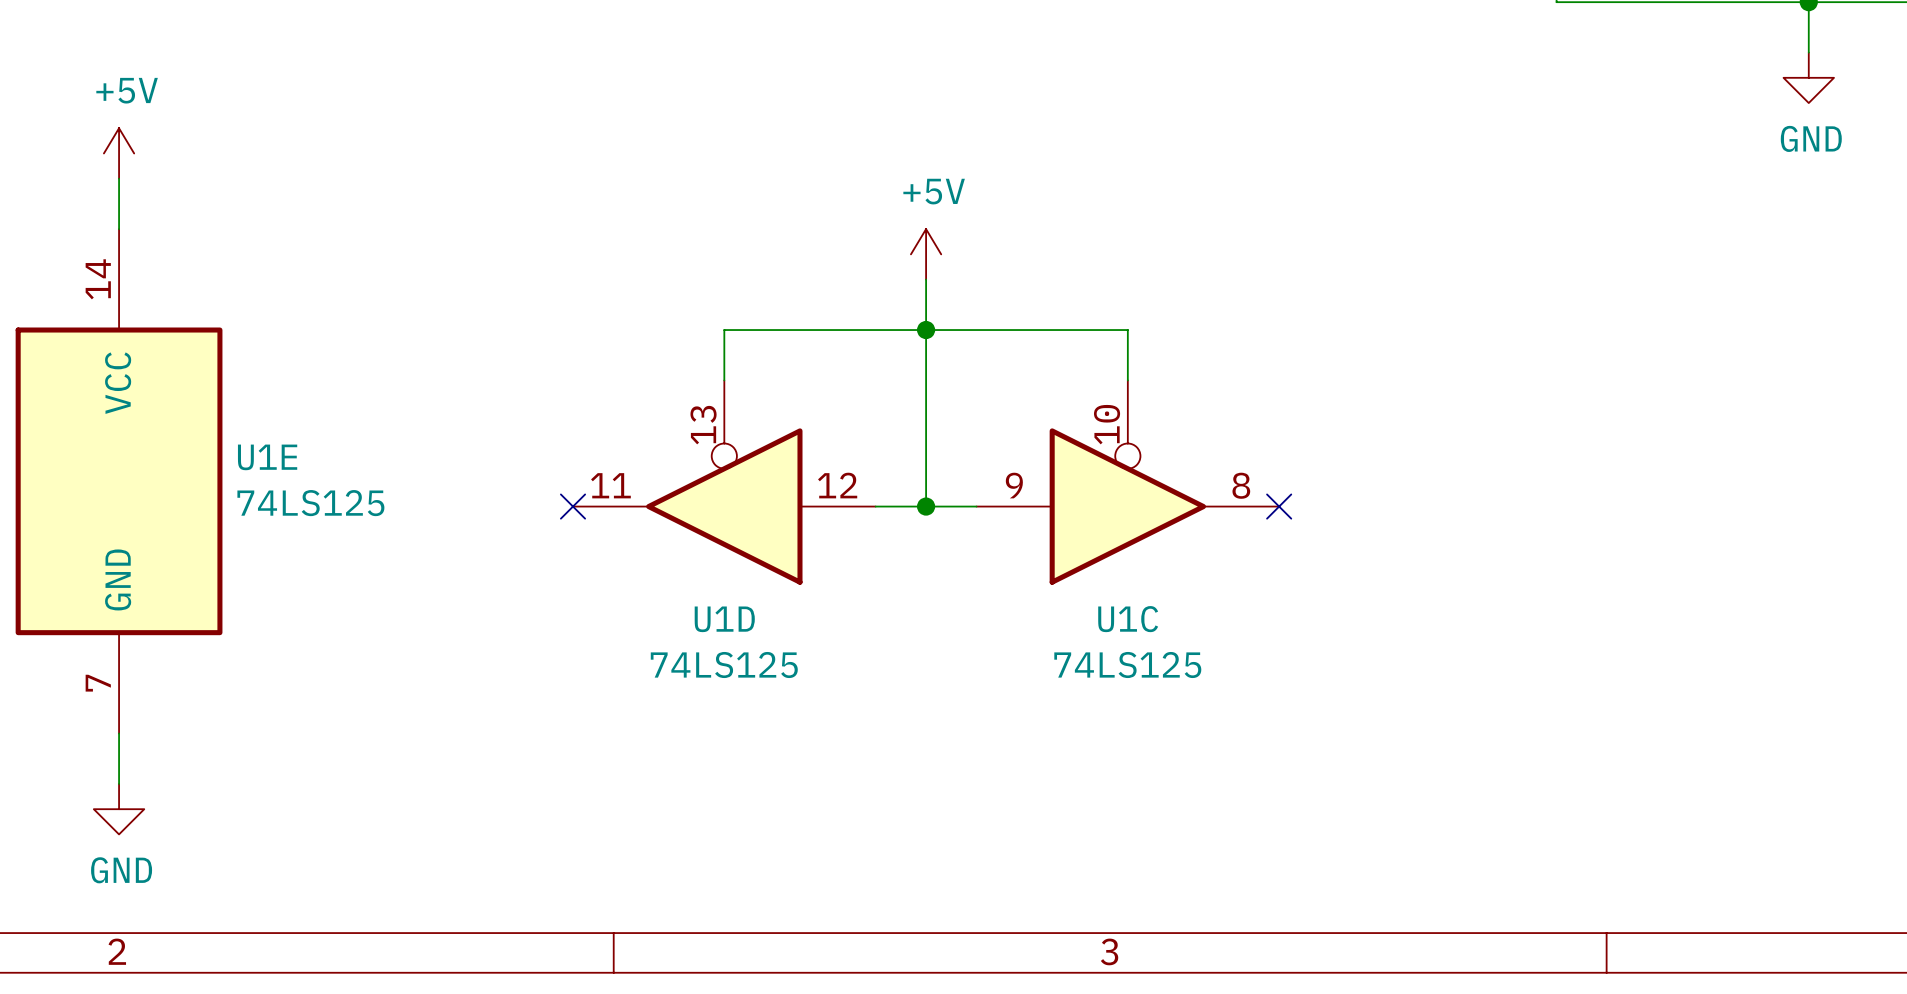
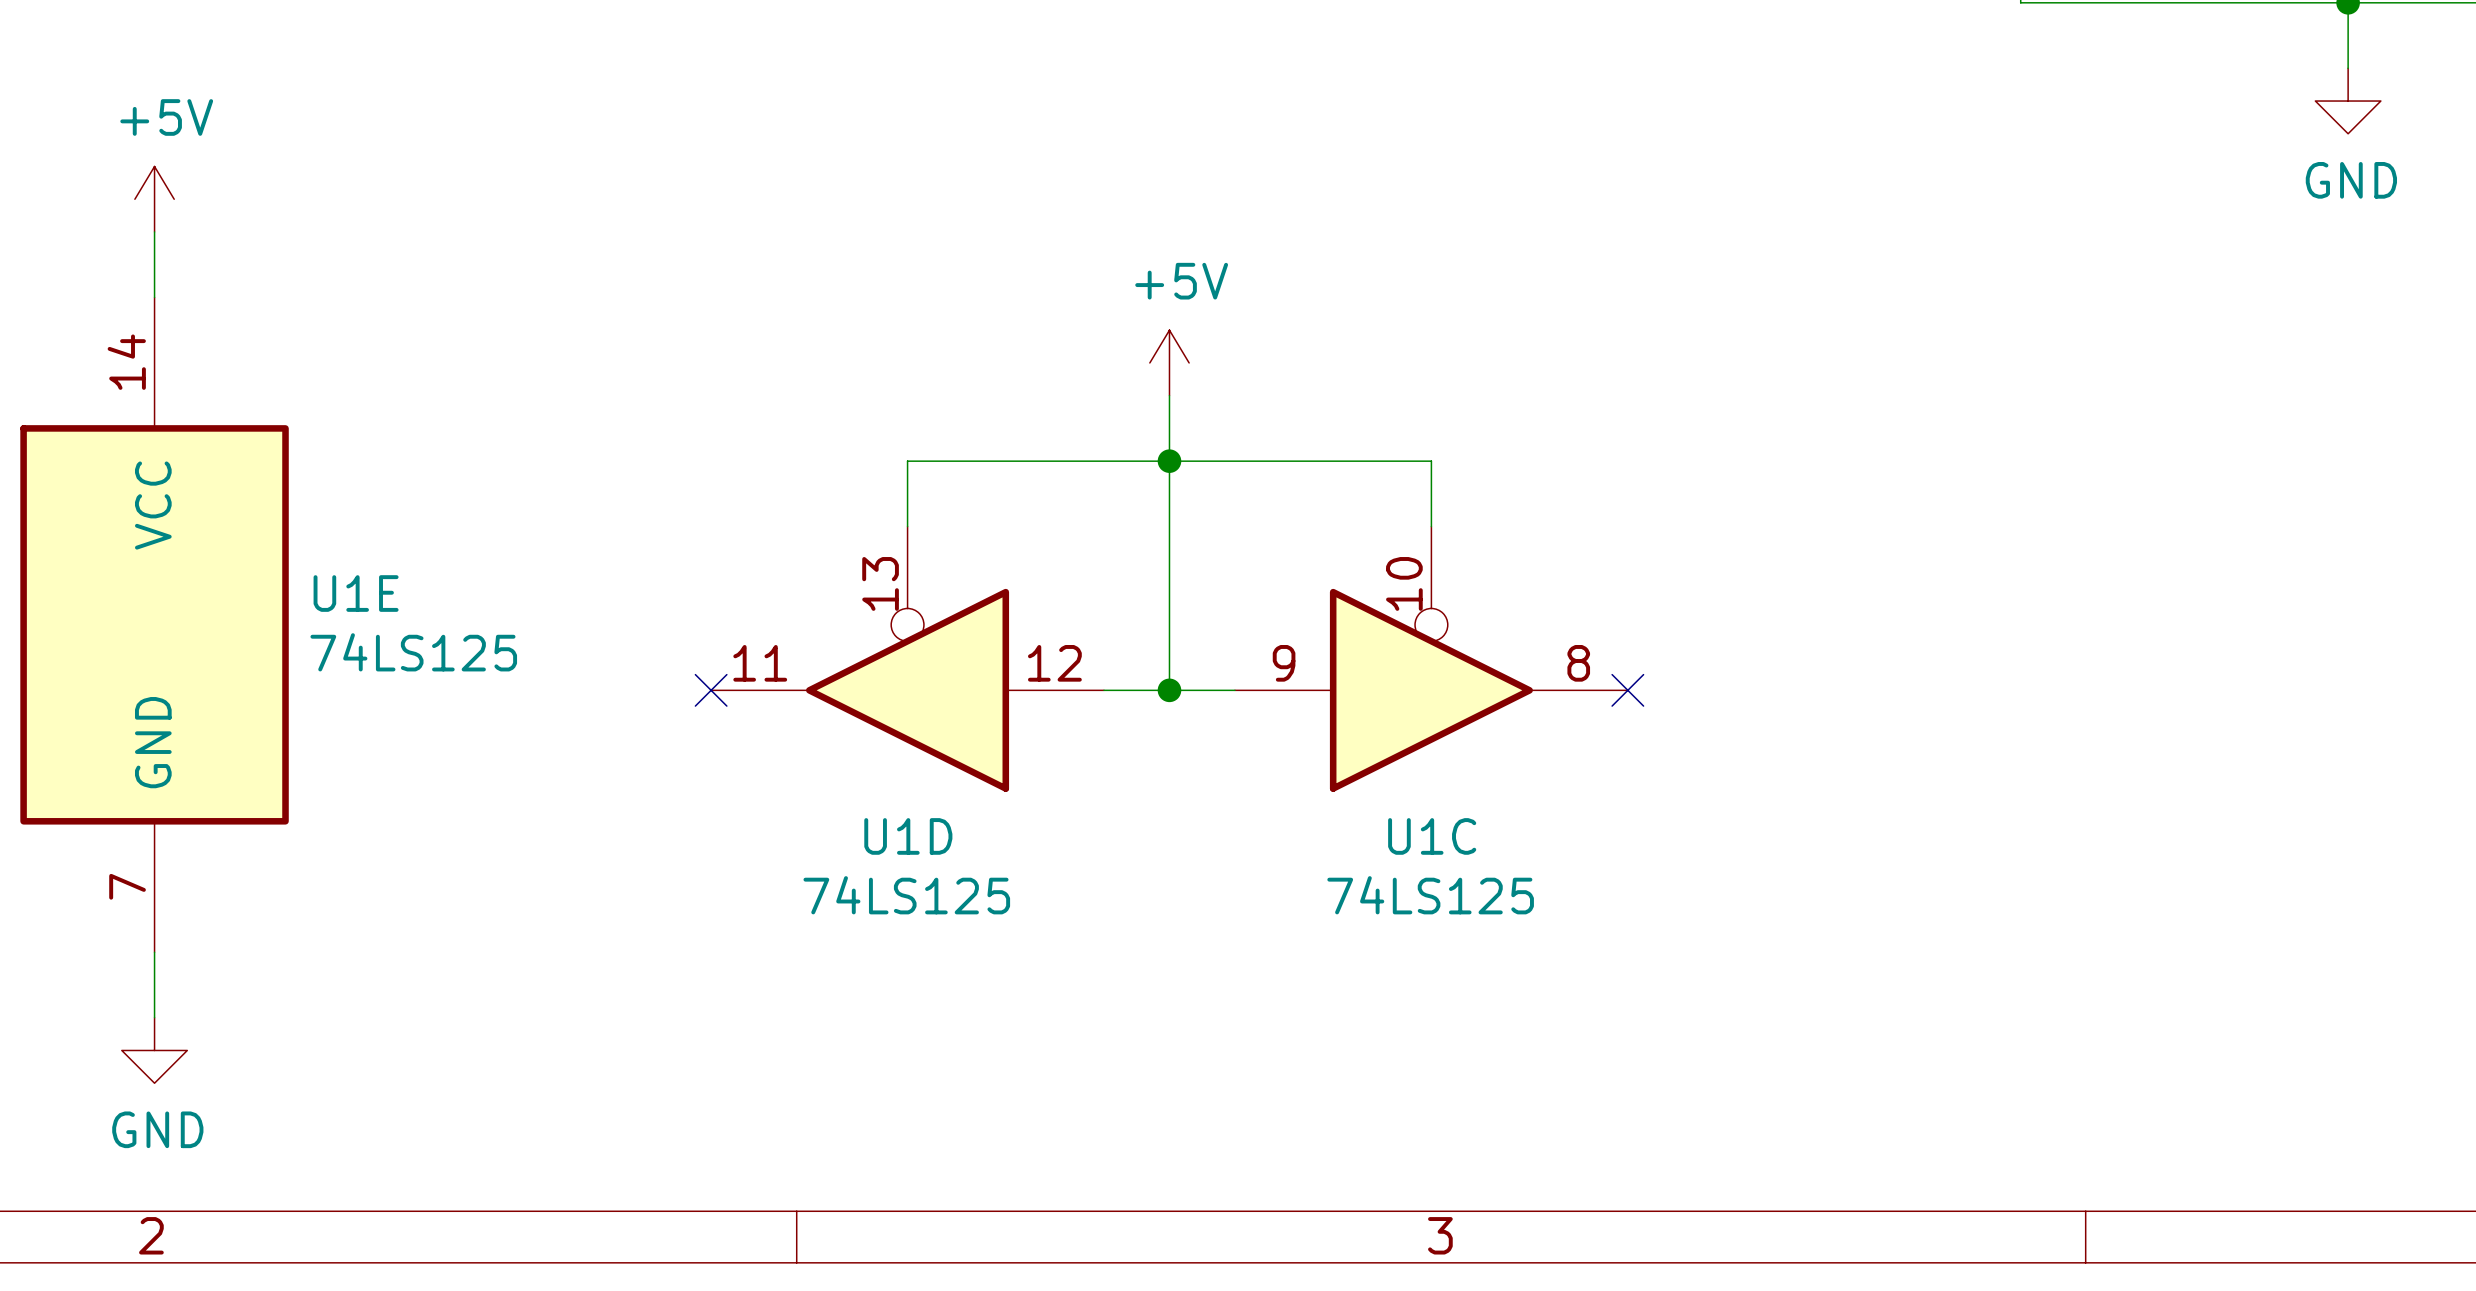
power symbol position: +5V (926, 254) -> +5V (1169, 362)
wire: (926, 279) (926, 506) -> (1169, 395) (1169, 690)
junction position: (926, 330) -> (1169, 461)
wire: (724, 380) (724, 330) (1127, 330) (1127, 380) -> (907, 526) (907, 461) (1431, 461) (1431, 526)
U1D position: (724, 482) -> (907, 659)
U1C position: (1127, 482) -> (1431, 659)
no-connect mark position: (573, 506) -> (711, 690)
wire: (875, 506) (976, 506) -> (1104, 690) (1234, 690)
junction position: (926, 506) -> (1169, 690)
no-connect mark position: (1279, 506) -> (1627, 690)

